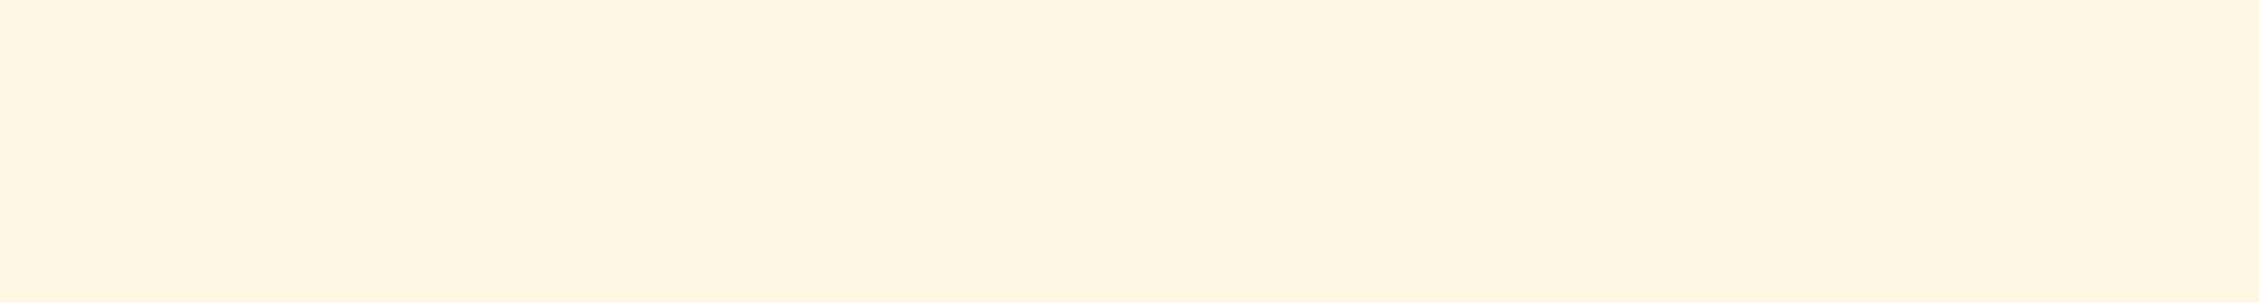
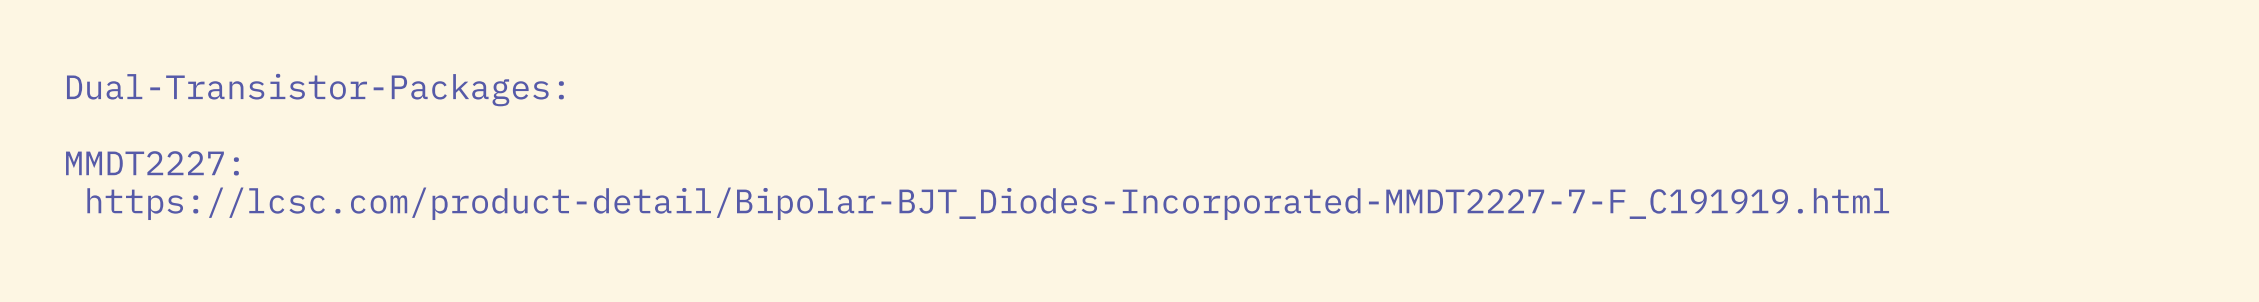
text: none -> Dual-Transistor-Packages: (315, 90)
text: none -> MMDT2227: (152, 163)
text: none -> https://lcsc.com/product-detail/Bipolar-BJT_Diodes-Incorporated-MMDT2227-7-F_C191919.html (988, 203)

